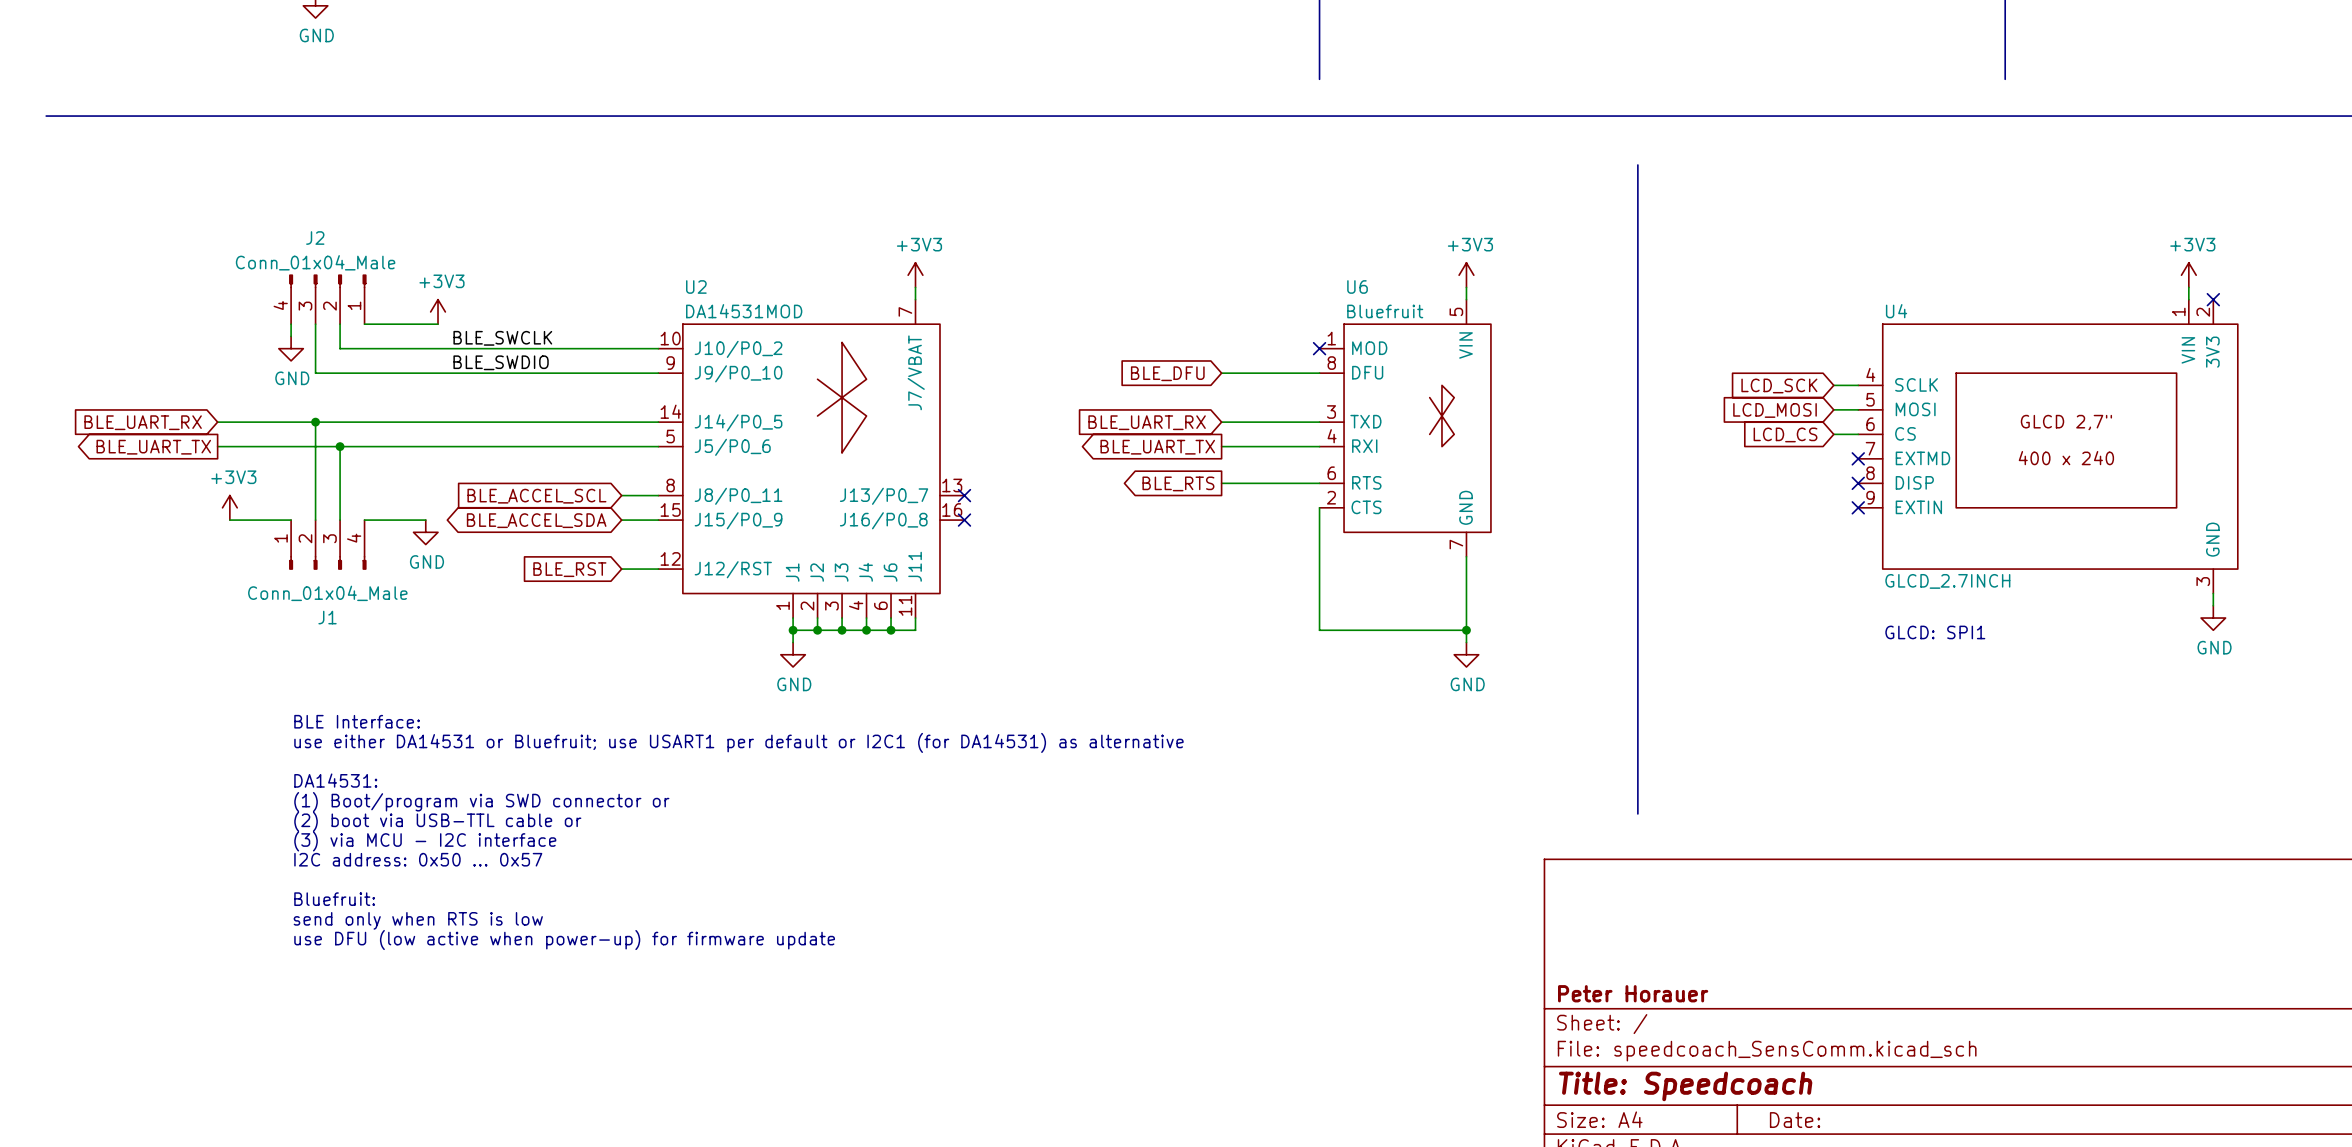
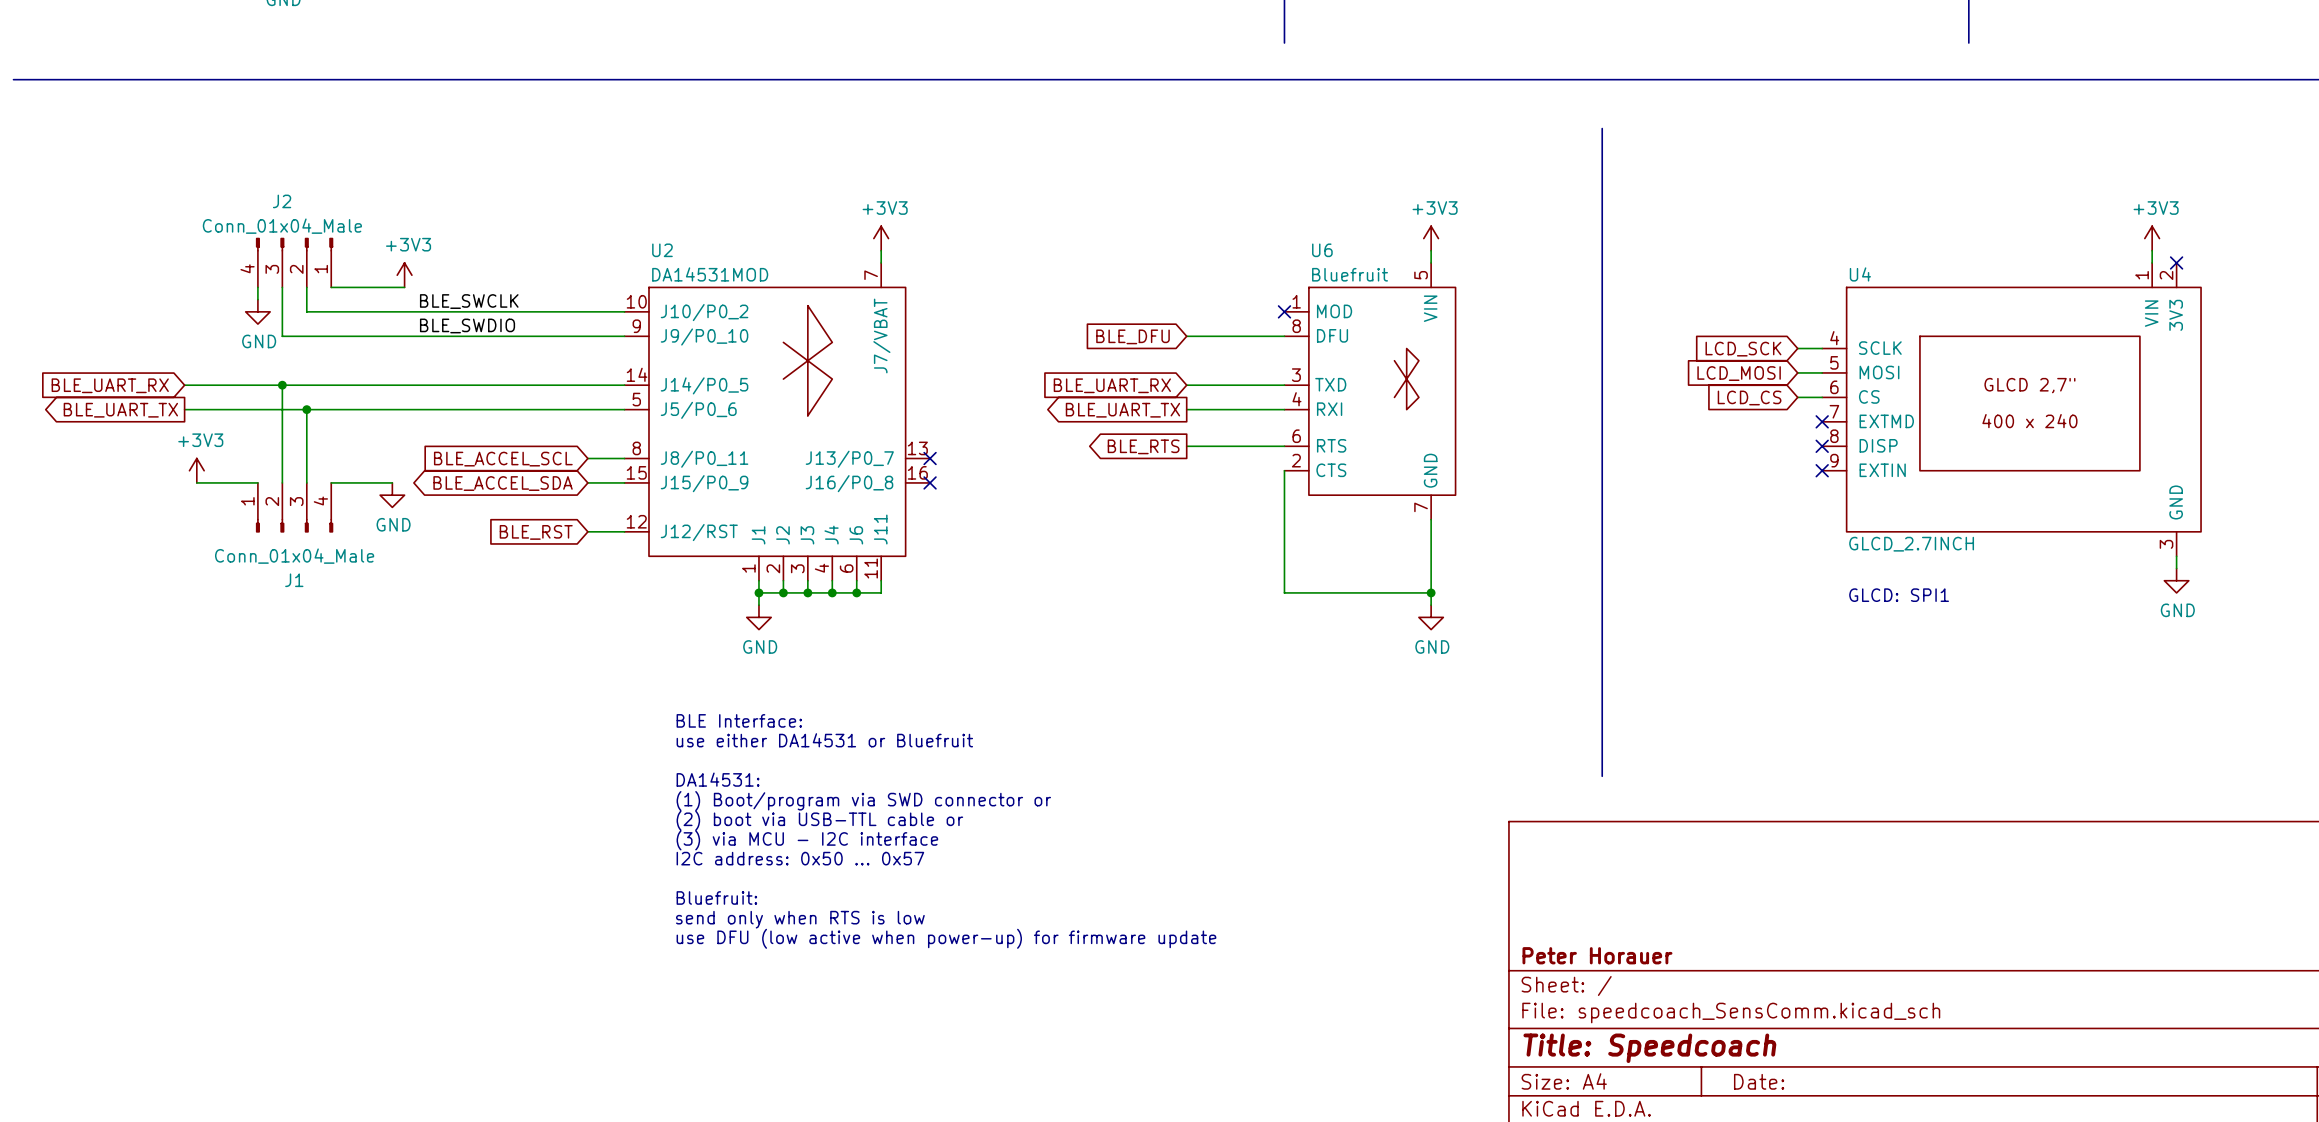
text: BLE Interface: (357, 721) -> none
text: use either DA14531 or Bluefruit; use USART1 per default or I2C1 (for DA14531) as alternative (738, 742) -> none
text: none -> BLE Interface: (739, 720)
text: none -> use either DA14531 or Bluefruit (824, 740)
text: DA14531: (335, 780) -> none
text: (1) Boot/program via SWD connector or (481, 802) -> none
text: none -> DA14531: (718, 779)
text: (2) boot via USB-TTL cable or (437, 821) -> none
text: none -> (1) Boot/program via SWD connector or (863, 801)
text: (3) via MCU - I2C interface (425, 841) -> none
text: none -> (2) boot via USB-TTL cable or (819, 820)
text: I2C address: 0x50 ... 0x57 (418, 859) -> none
text: none -> (3) via MCU - I2C interface (807, 840)
text: none -> I2C address: 0x50 ... 0x57 (800, 858)
text: Bluefruit: (334, 899) -> none
text: send only when RTS is low (418, 920) -> none
text: none -> Bluefruit: (716, 897)
text: use DFU (low active when power-up) for firmware update (564, 940) -> none
text: none -> send only when RTS is low (800, 919)
text: none -> use DFU (low active when power-up) for firmware update (946, 938)

